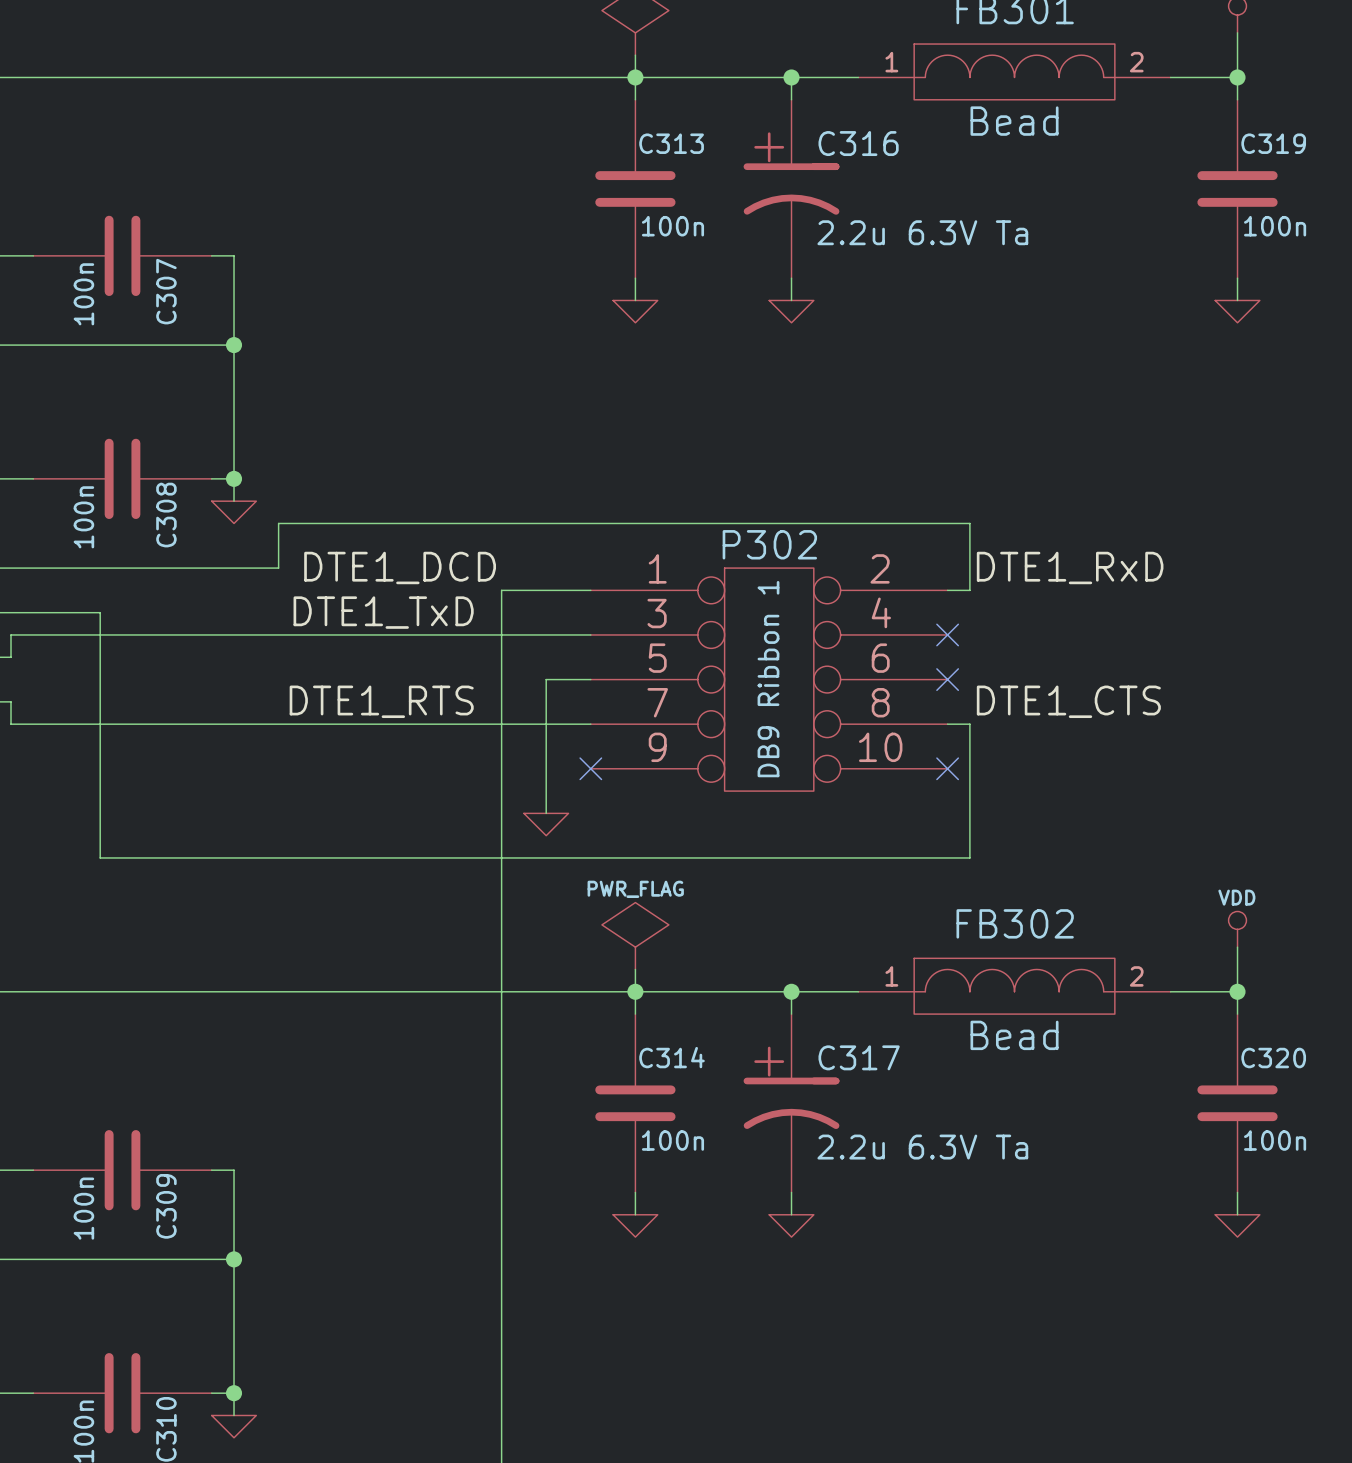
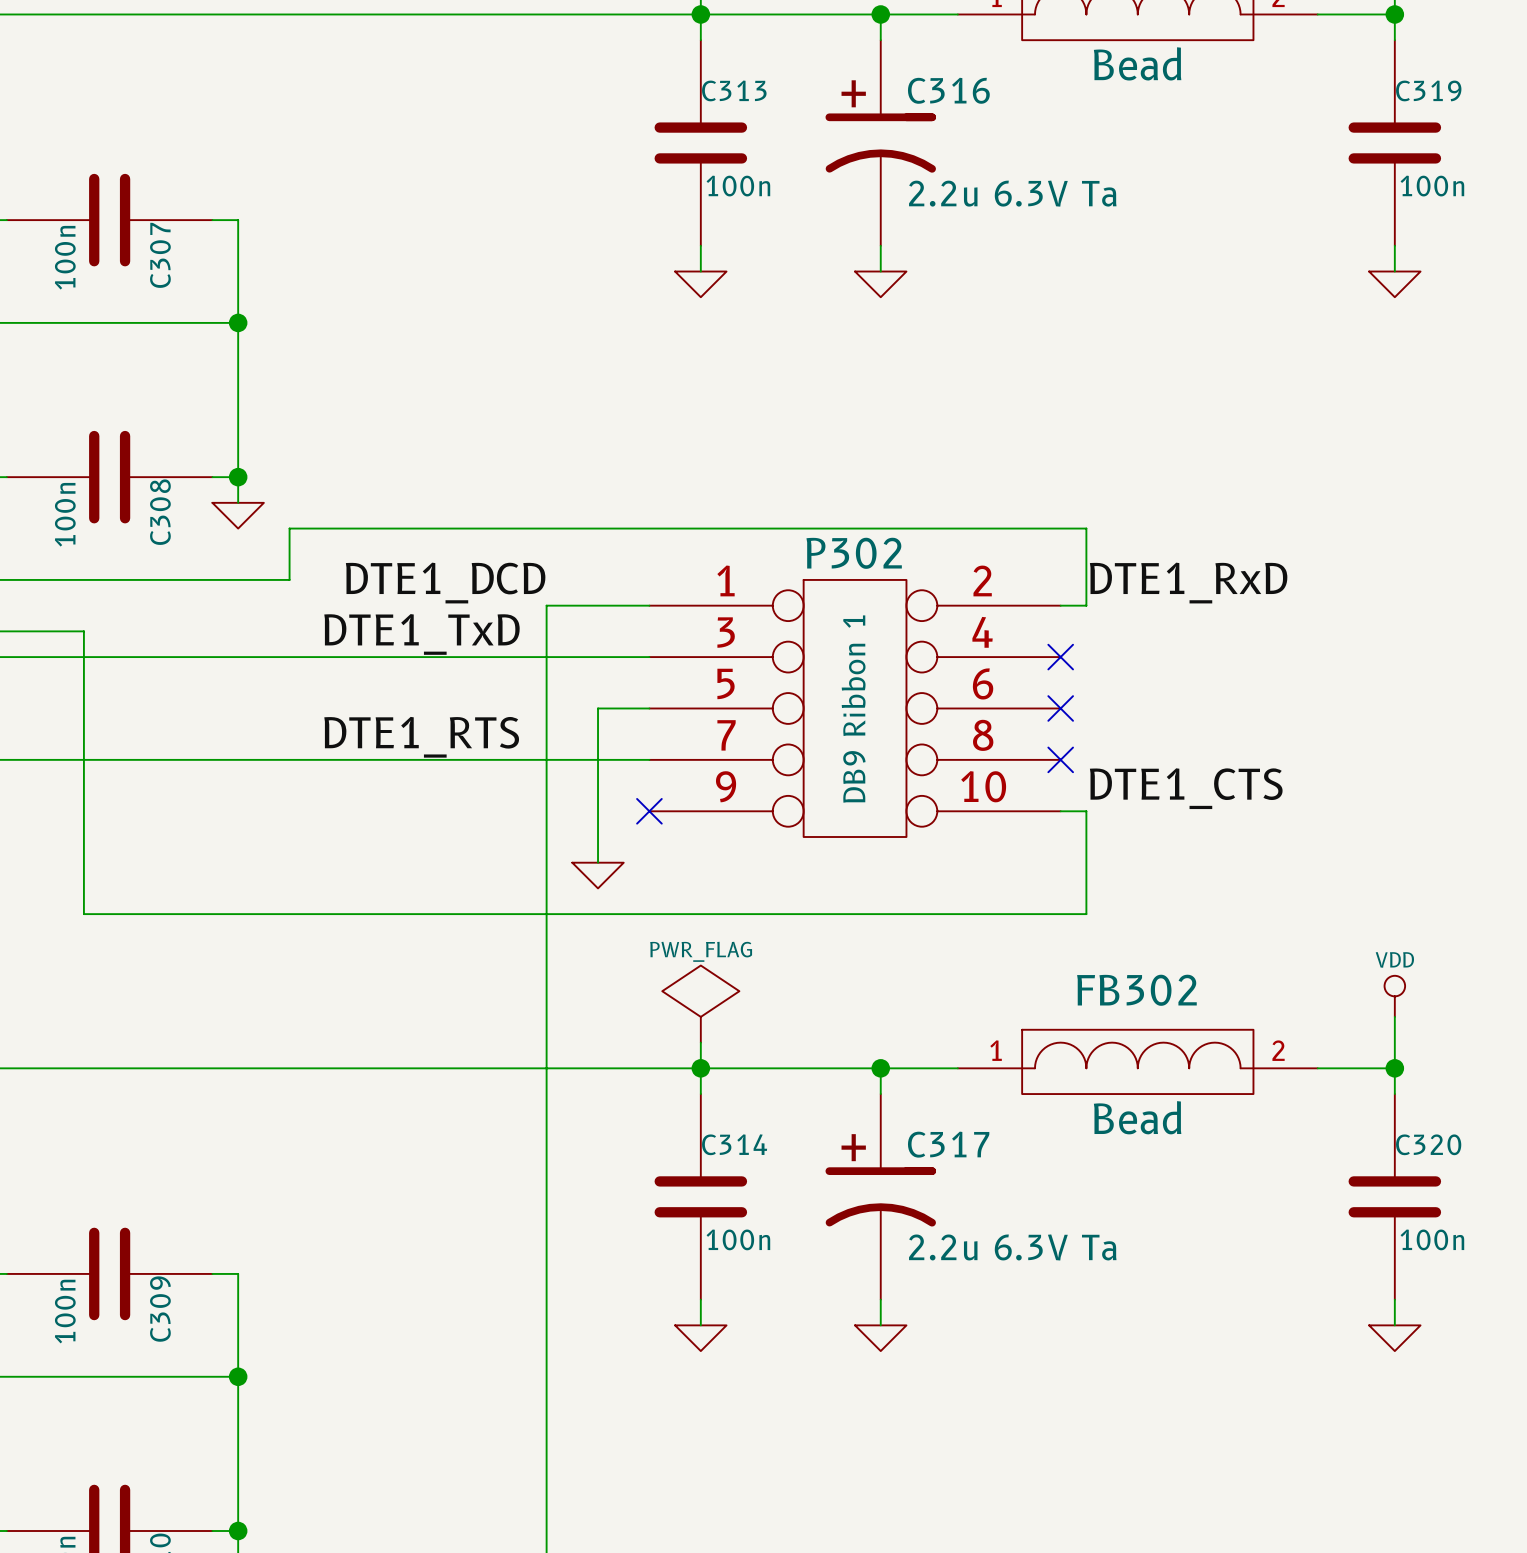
label position: DTE1_CTS (1068, 701) -> DTE1_CTS (1186, 788)
wire: (947, 724) (969, 724) (969, 768) -> (1060, 811) (1086, 811)
no-connect mark position: (947, 768) -> (1060, 759)

